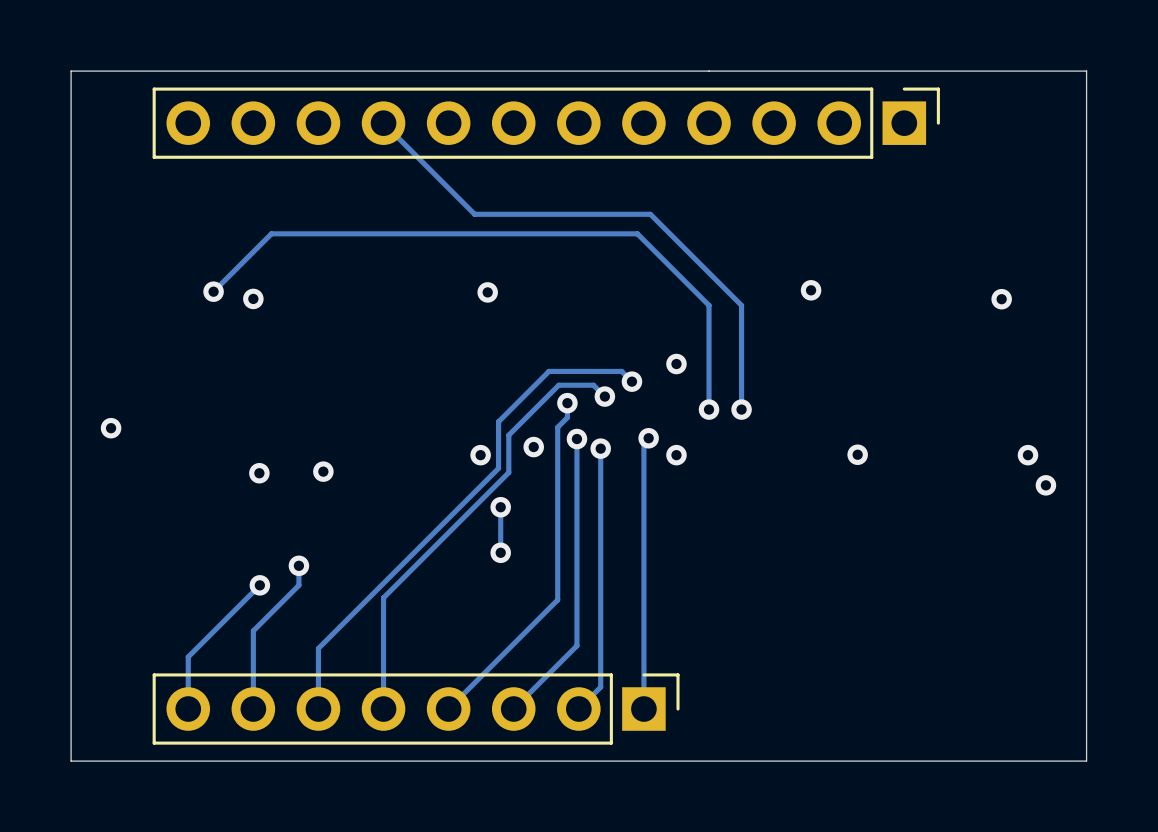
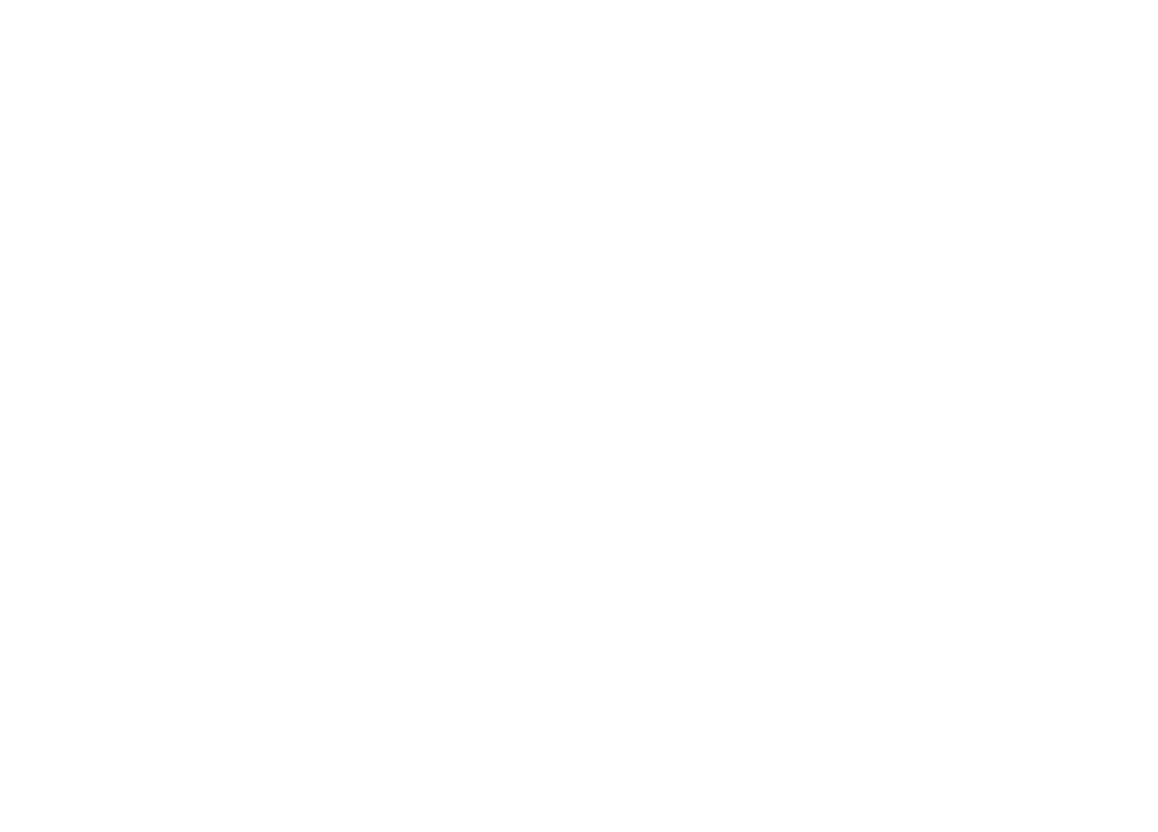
board edge: (1086, 71) (71, 71) (71, 761) (1086, 761) (1086, 71) -> none
track: (383, 123) (474, 214) (650, 214) (741, 305) (741, 409) -> none
part: (546, 123) -> none
via: (811, 290) -> none
track: (213, 291) (271, 233) (637, 233) (709, 305) (709, 409) -> none
via: (213, 291) -> none
via: (487, 292) -> none
via: (253, 298) -> none
via: (1001, 299) -> none
via: (676, 364) -> none
track: (631, 381) (621, 371) (548, 371) (498, 421) (498, 468) (318, 648) (318, 709) -> none
via: (631, 381) -> none
track: (604, 396) (593, 385) (558, 385) (508, 435) (508, 472) (383, 597) (383, 709) -> none
via: (604, 396) -> none
track: (567, 403) (567, 417) (557, 427) (557, 599) (448, 709) -> none
via: (567, 403) -> none
via: (709, 409) -> none
via: (741, 409) -> none
via: (111, 428) -> none
track: (648, 438) (643, 442) (643, 709) -> none
via: (648, 438) -> none
track: (576, 439) (576, 645) (513, 709) -> none
via: (576, 439) -> none
via: (533, 447) -> none
track: (600, 448) (600, 687) (578, 709) -> none
via: (600, 448) -> none
via: (857, 454) -> none
via: (480, 455) -> none
via: (676, 455) -> none
via: (1027, 455) -> none
via: (323, 471) -> none
via: (259, 473) -> none
via: (1045, 485) -> none
track: (500, 507) (500, 552) -> none
via: (500, 507) -> none
via: (500, 552) -> none
track: (298, 565) (298, 585) (253, 630) (253, 709) -> none
via: (298, 565) -> none
track: (259, 585) (188, 656) (188, 709) -> none
via: (259, 585) -> none
part: (416, 709) -> none

